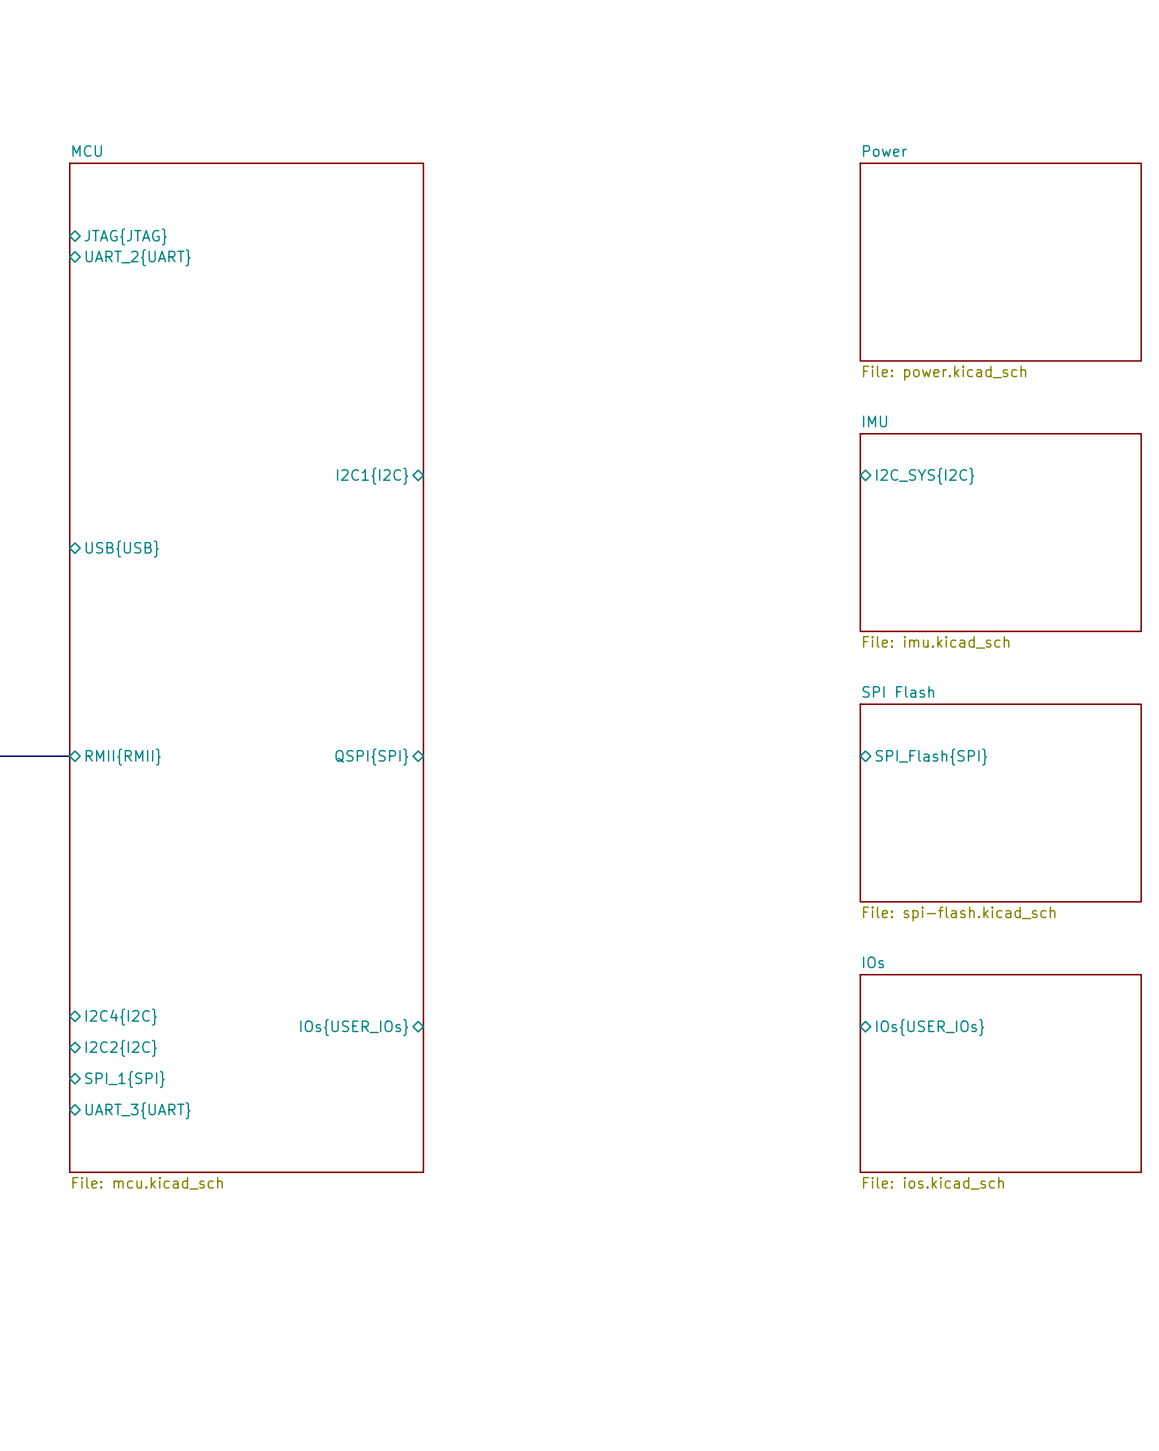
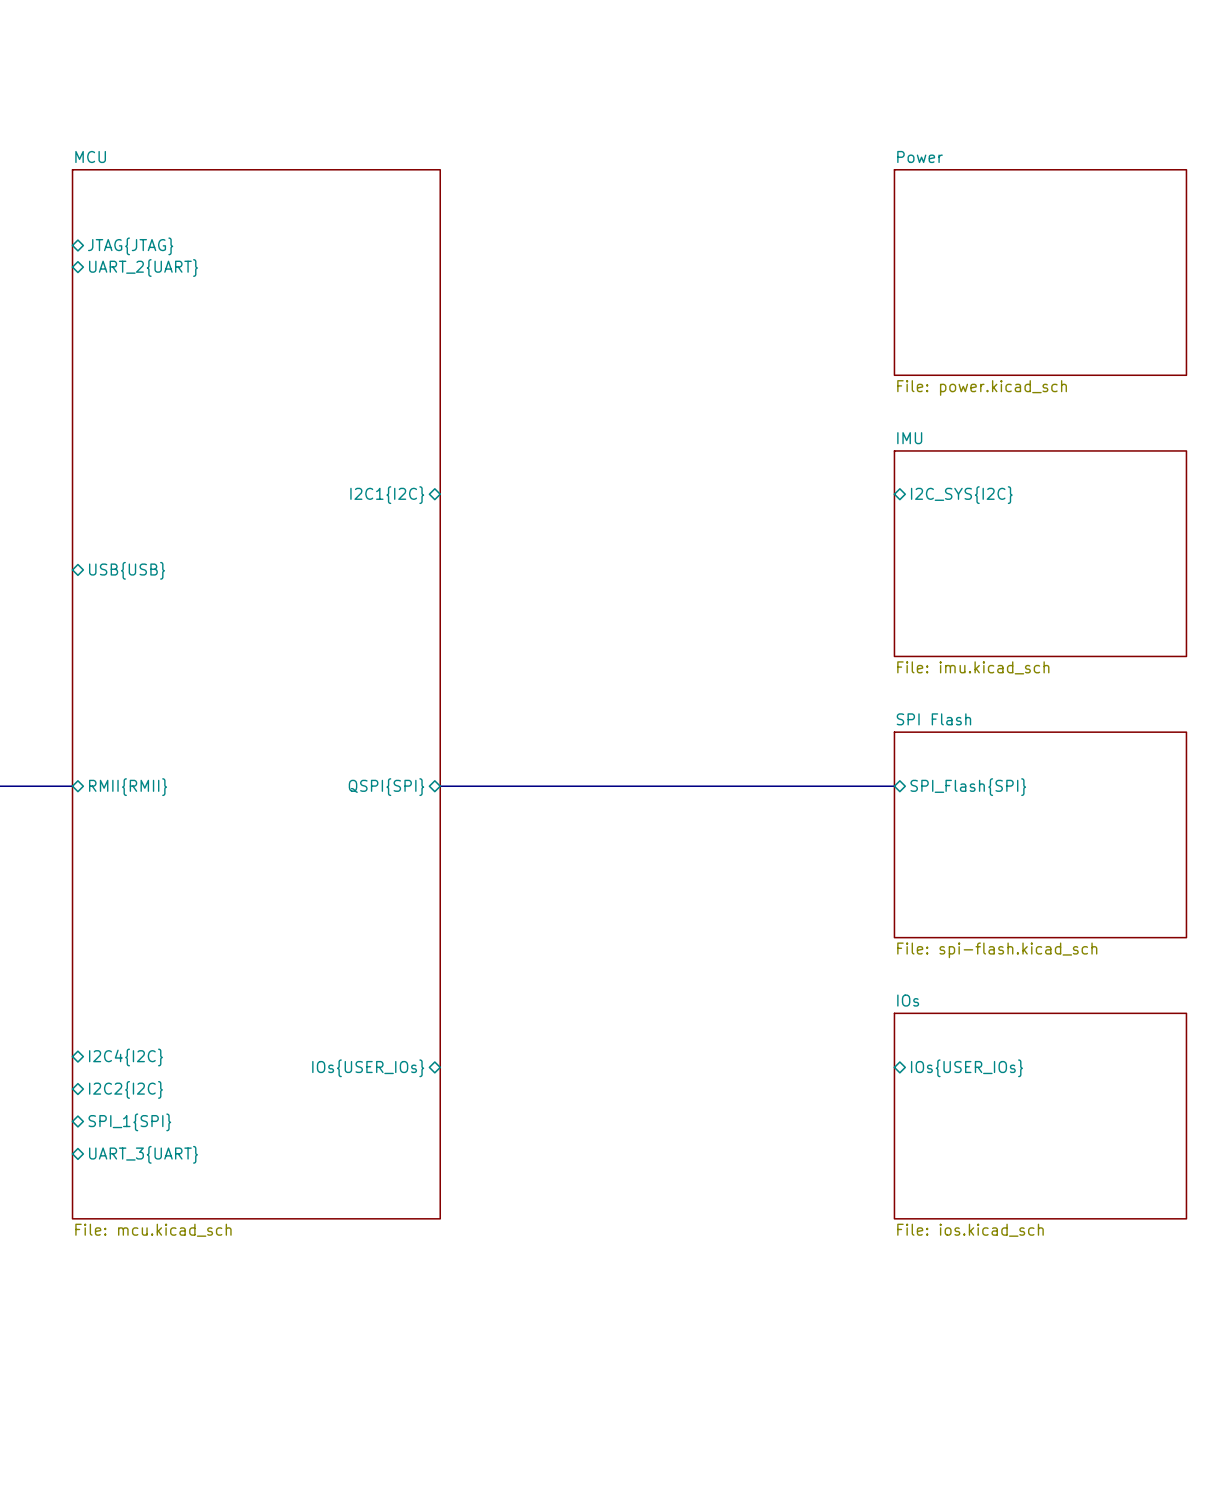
bus: none -> (440, 786) (894, 786)

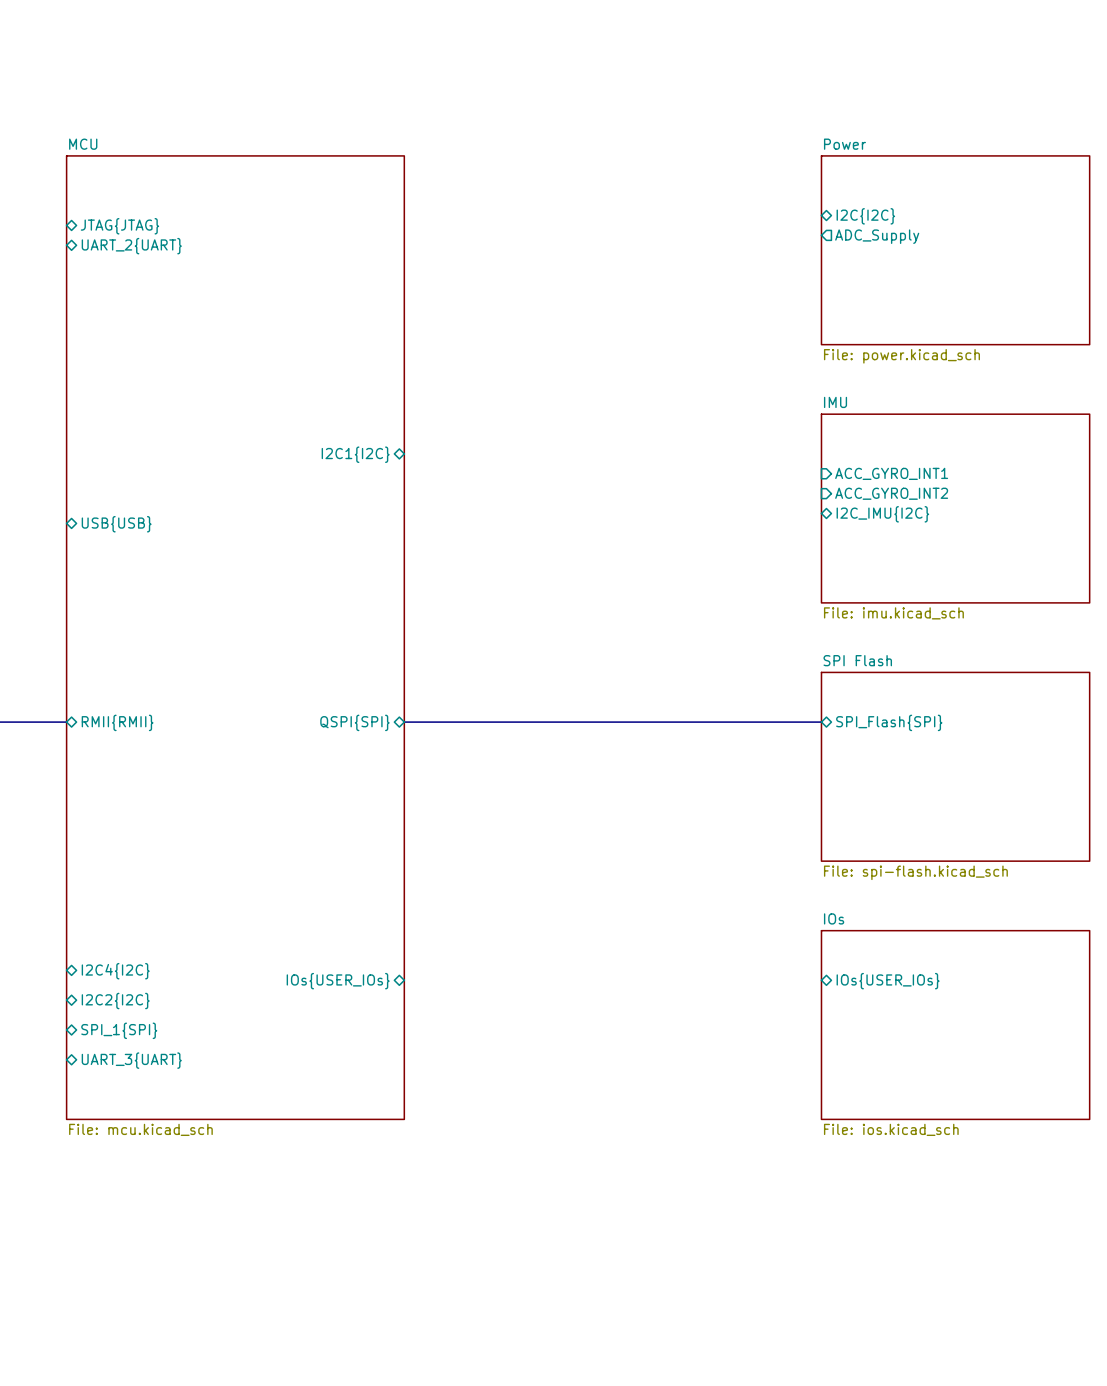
sheet pin: none -> I2C{I2C} (865, 216)
sheet pin: none -> ADC_Supply (877, 236)
sheet pin: I2C_SYS{I2C} (961, 495) -> none
sheet pin: none -> ACC_GYRO_INT1 (891, 473)
sheet pin: none -> ACC_GYRO_INT2 (891, 493)
sheet pin: none -> I2C_IMU{I2C} (882, 514)

